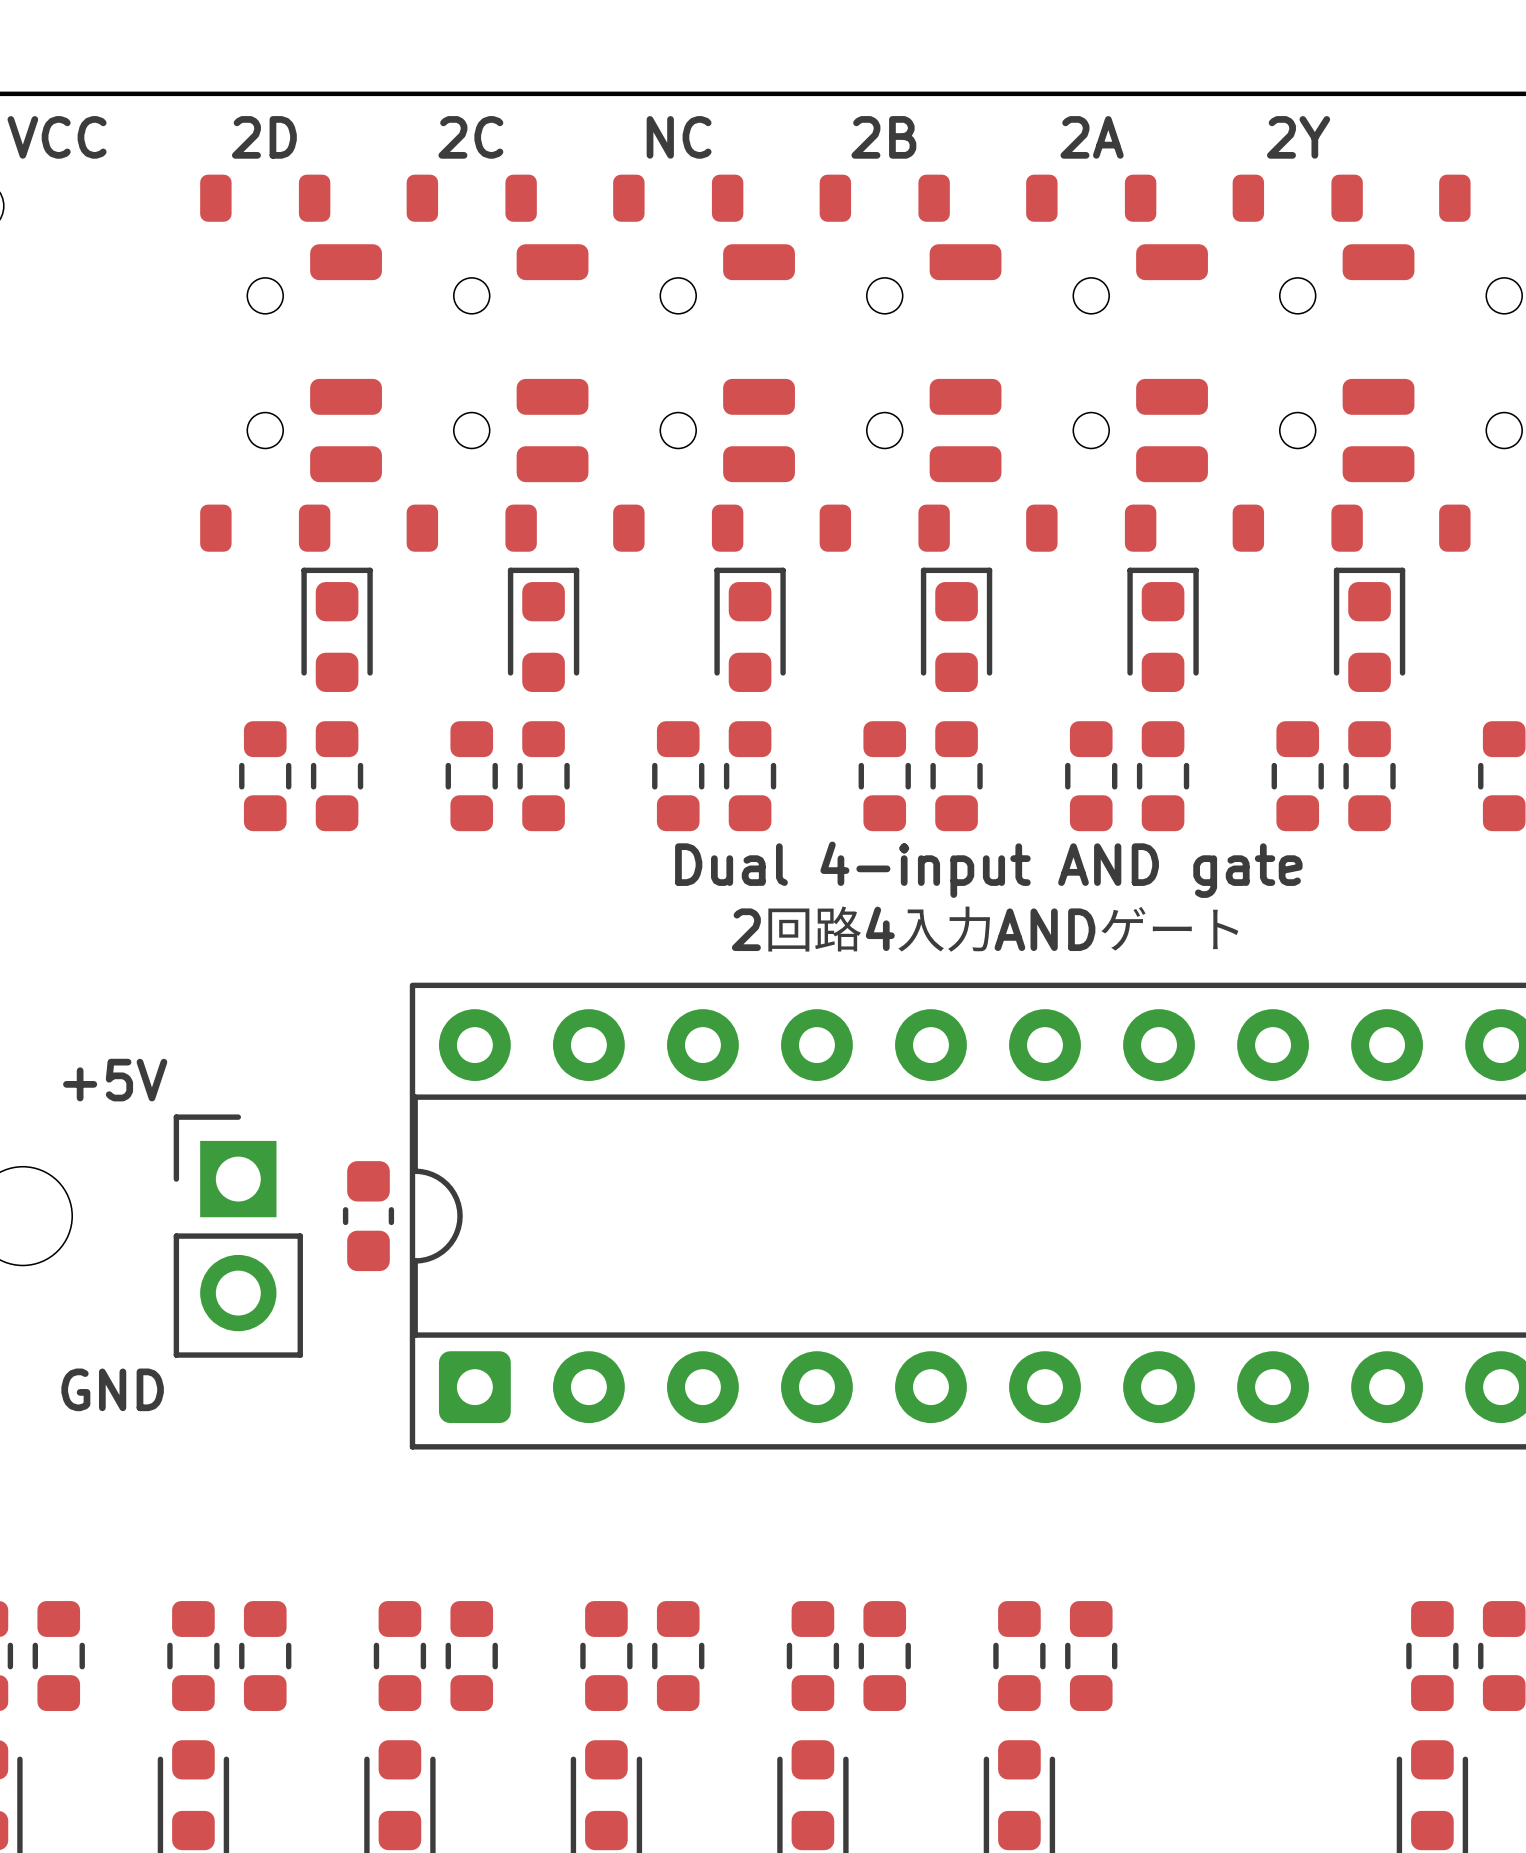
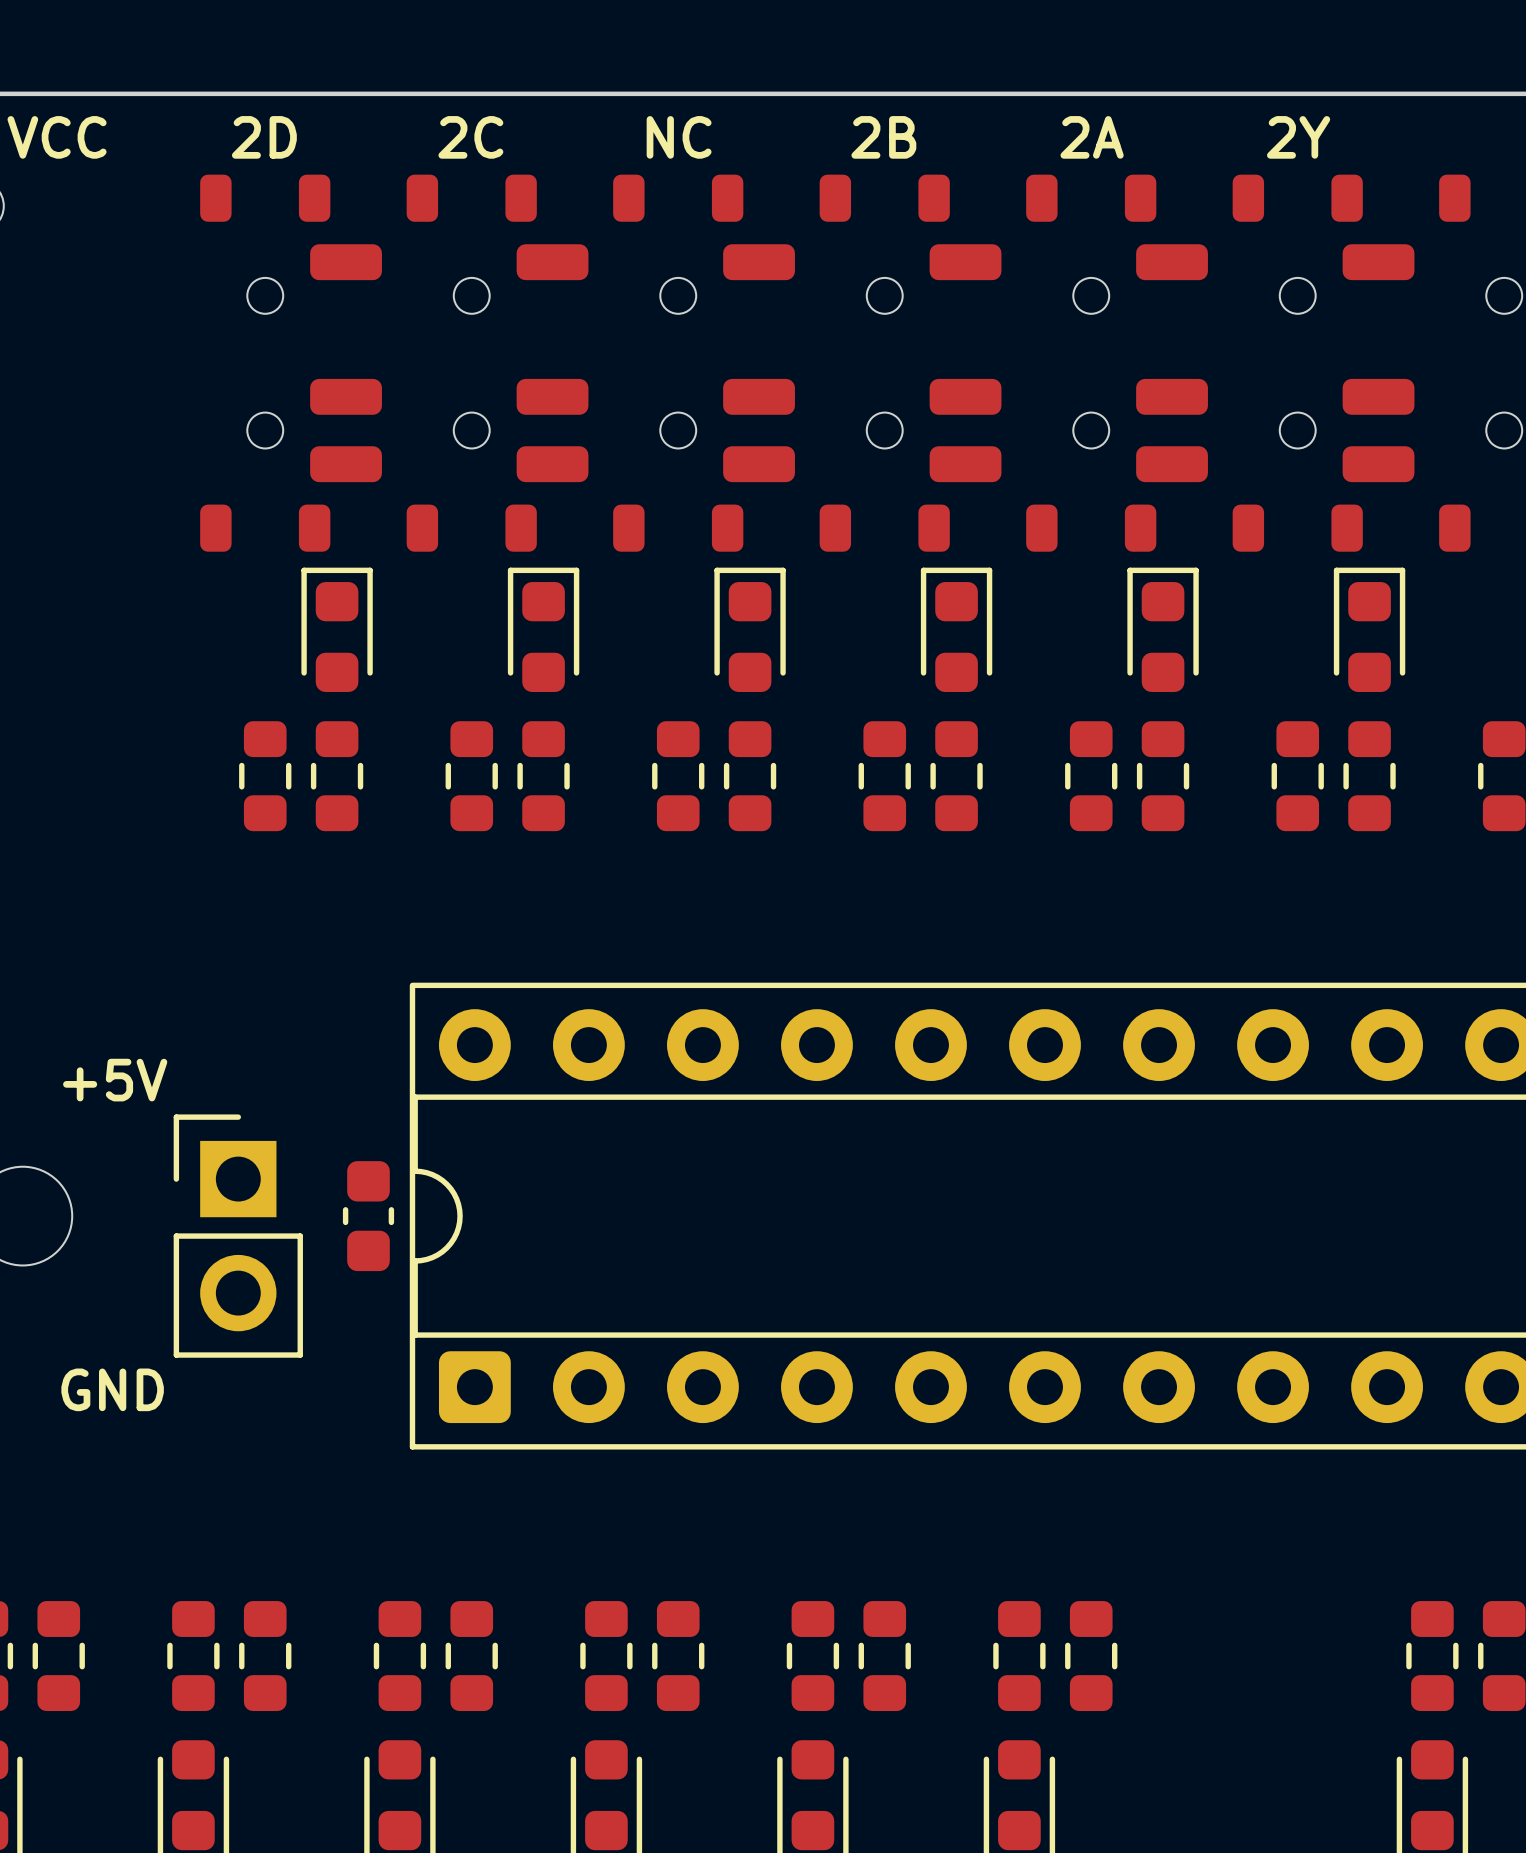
text: Dual 4-input AND gate (988, 869) -> none
text: 2回路4入力ANDゲート (986, 929) -> none

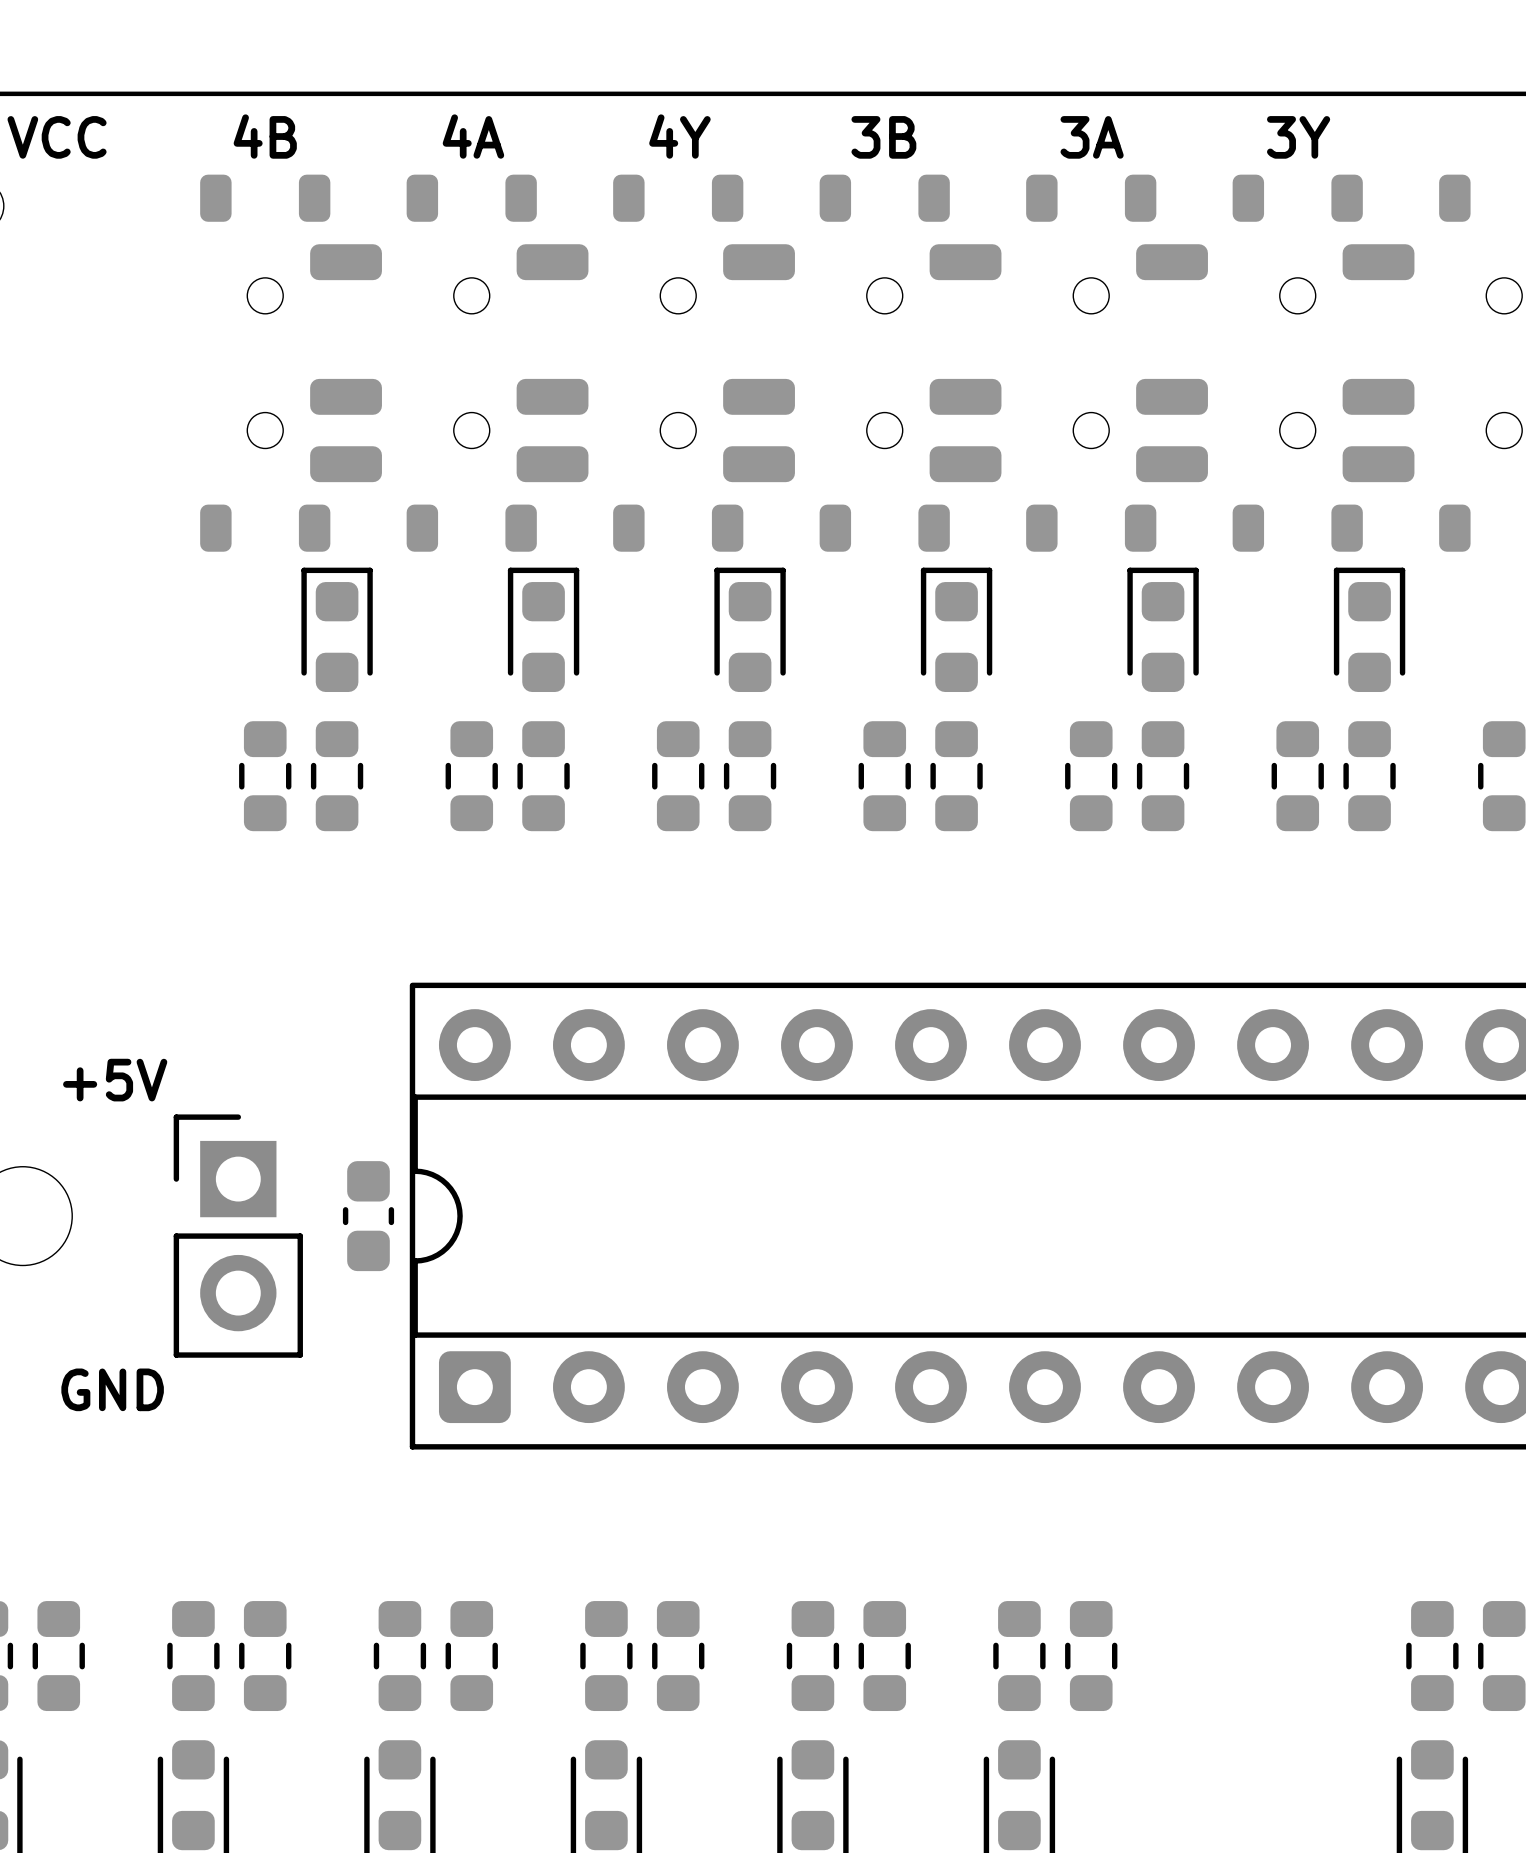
text: 2D (264, 137) -> 4B (265, 136)
text: 2C (470, 137) -> 4A (473, 136)
text: NC (679, 137) -> 4Y (679, 136)
text: 2B (883, 137) -> 3B (883, 137)
text: 2A (1092, 137) -> 3A (1092, 137)
text: 2Y (1298, 137) -> 3Y (1298, 137)

